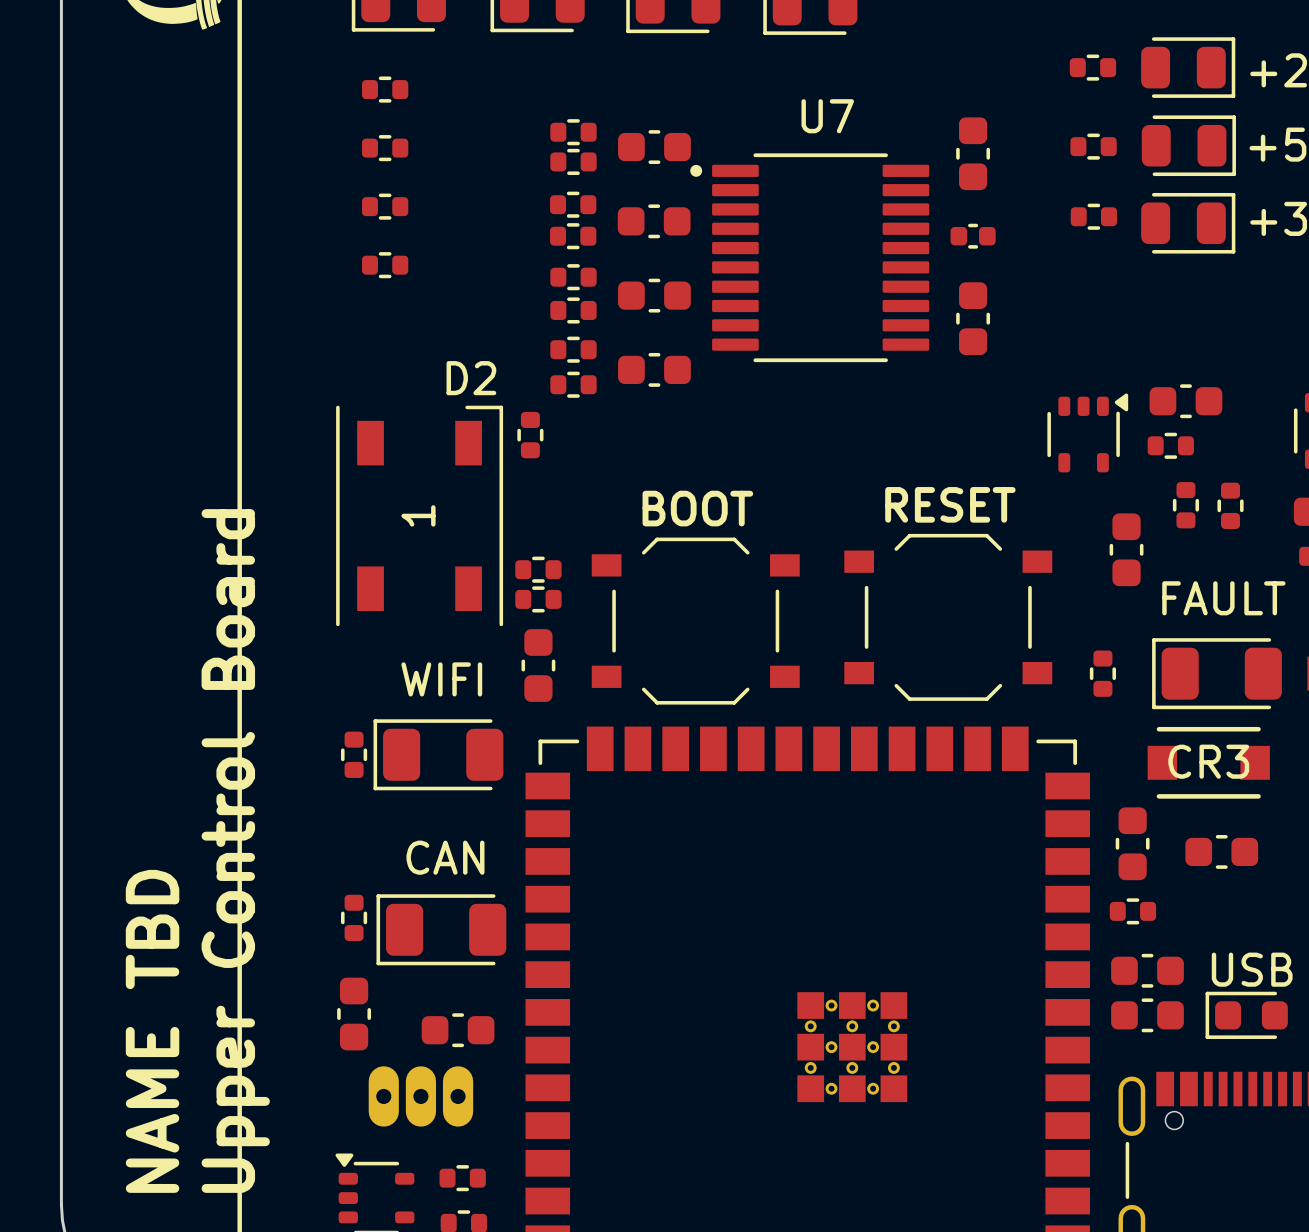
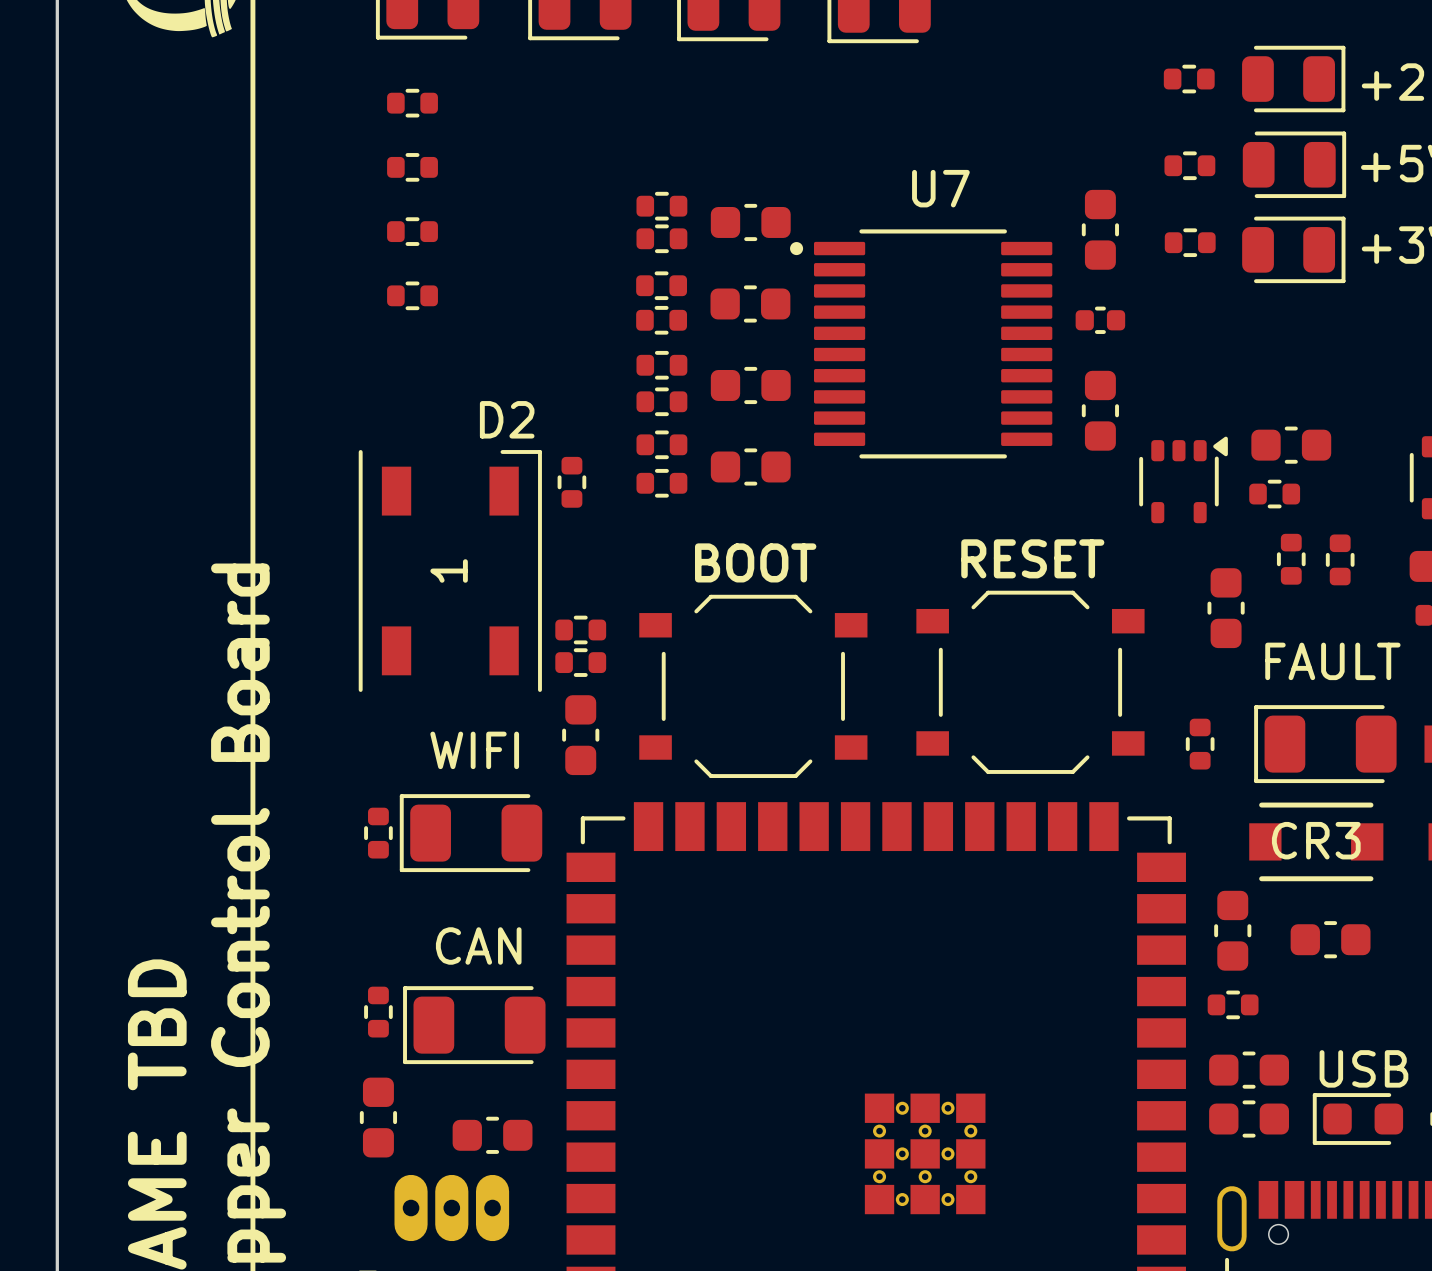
part: (573, 132) -> none
part: (654, 147) -> none
part: (973, 153) -> none
part: (573, 161) -> none
part: none -> (661, 206)
part: none -> (750, 222)
part: (573, 204) -> none
part: none -> (1100, 229)
part: none -> (661, 238)
part: (654, 221) -> none
part: (573, 236) -> none
part position: (973, 236) -> (1100, 320)
part: none -> (661, 285)
U7 position: (809, 257) -> (921, 343)
part: none -> (750, 303)
part: (573, 277) -> none
part: none -> (661, 320)
part: (654, 295) -> none
part: (573, 310) -> none
part: (973, 318) -> none
part: none -> (661, 365)
part: none -> (750, 385)
part: (573, 349) -> none
part: none -> (661, 401)
part: (654, 369) -> none
part: none -> (1100, 410)
part: (573, 384) -> none
part: none -> (661, 444)
part: none -> (750, 466)
part: none -> (661, 483)

